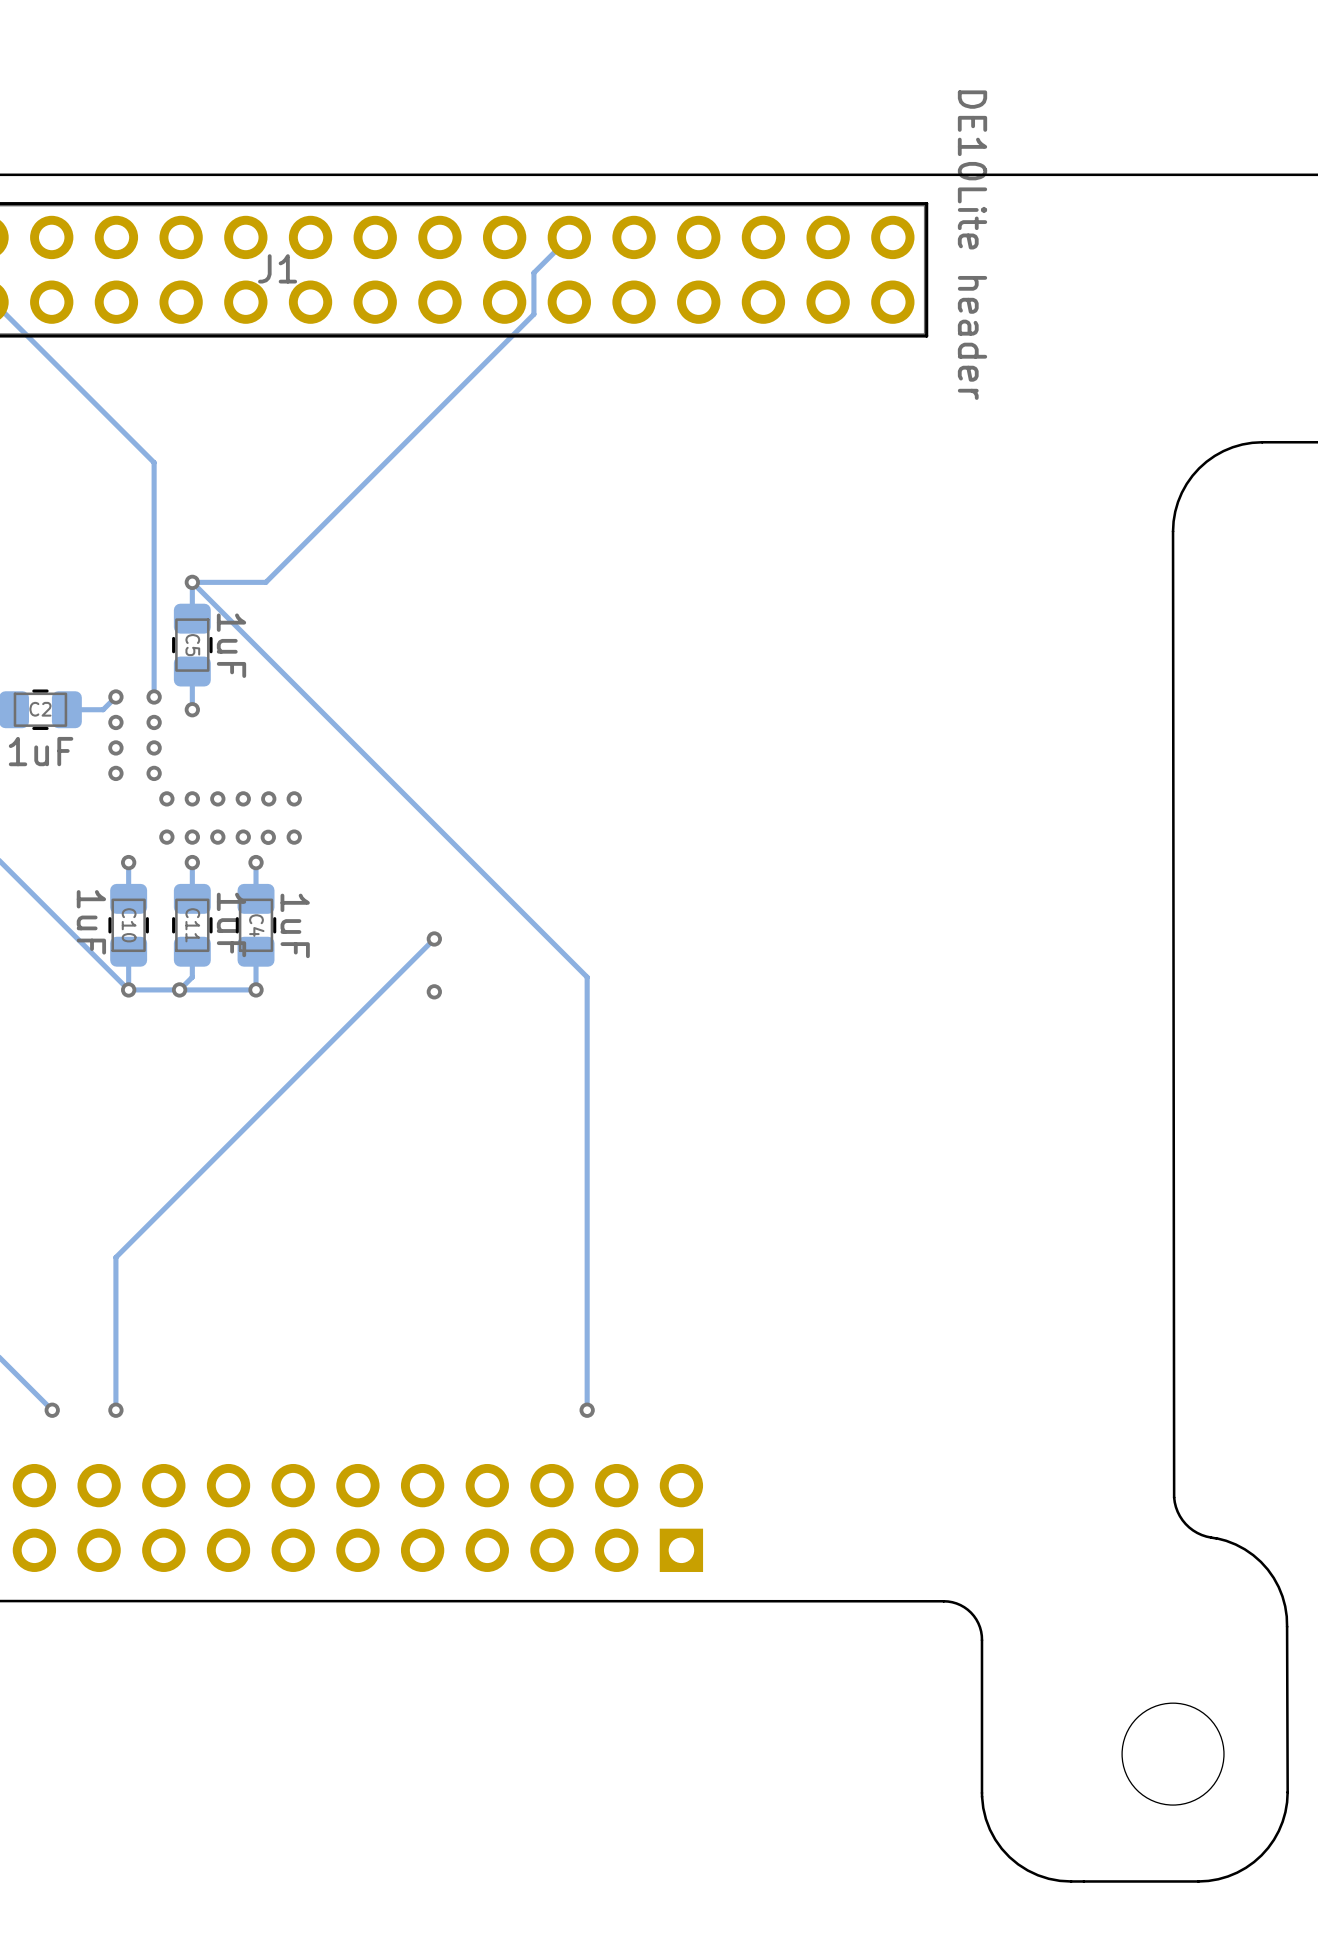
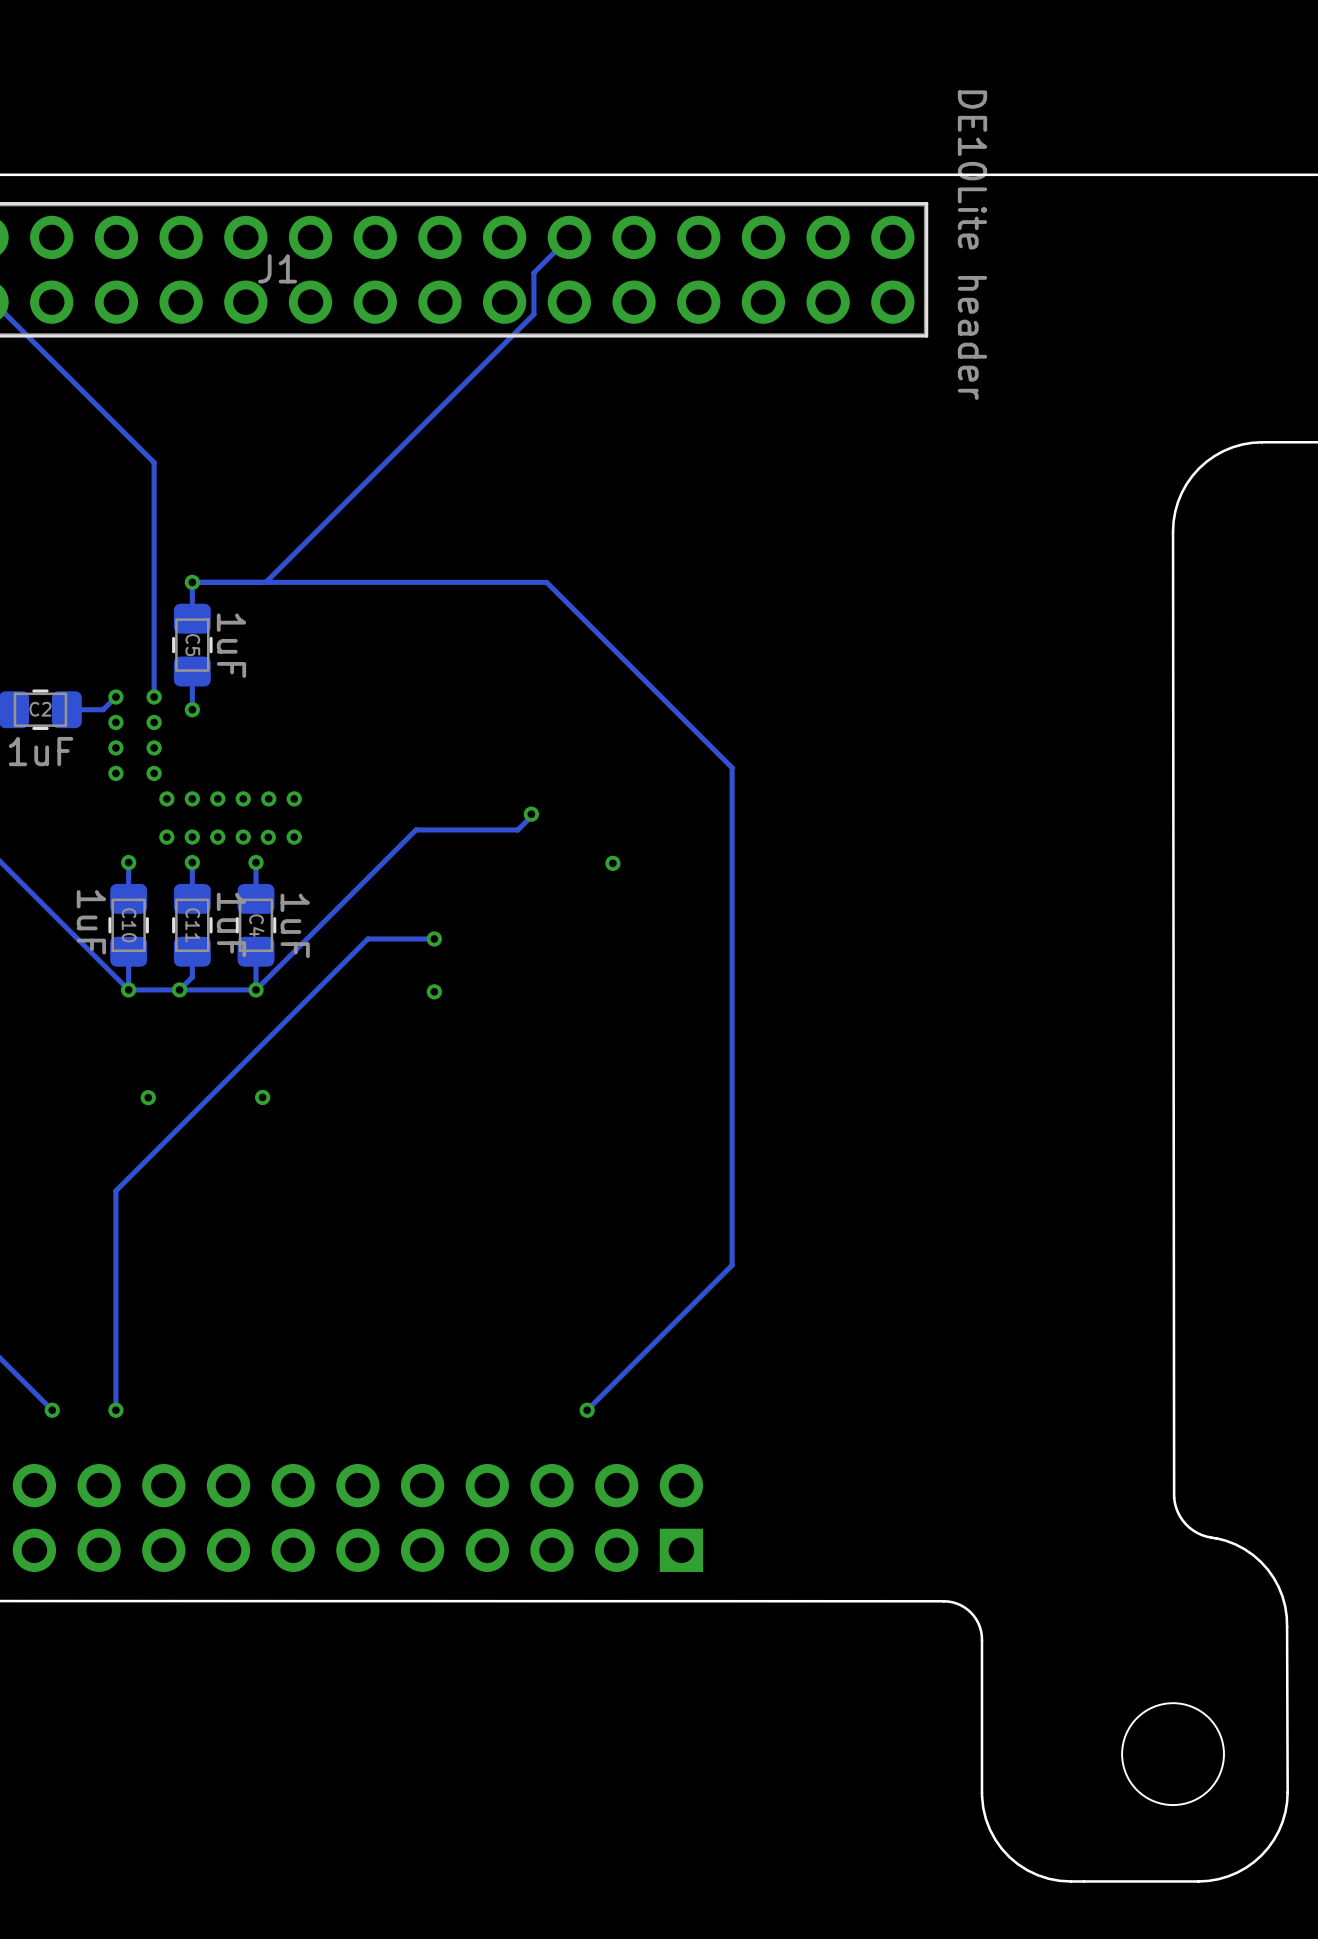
track: (192, 582) (587, 977) (587, 1410) -> (265, 582) (546, 582) (732, 767) (732, 1265) (587, 1410)
via: none -> (531, 814)
track: none -> (532, 814) (517, 829) (415, 829) (256, 989)
via: none -> (612, 863)
track: (434, 938) (115, 1257) -> (434, 938) (367, 938) (115, 1190) (115, 1257)
via: none -> (148, 1097)
via: none -> (262, 1097)

